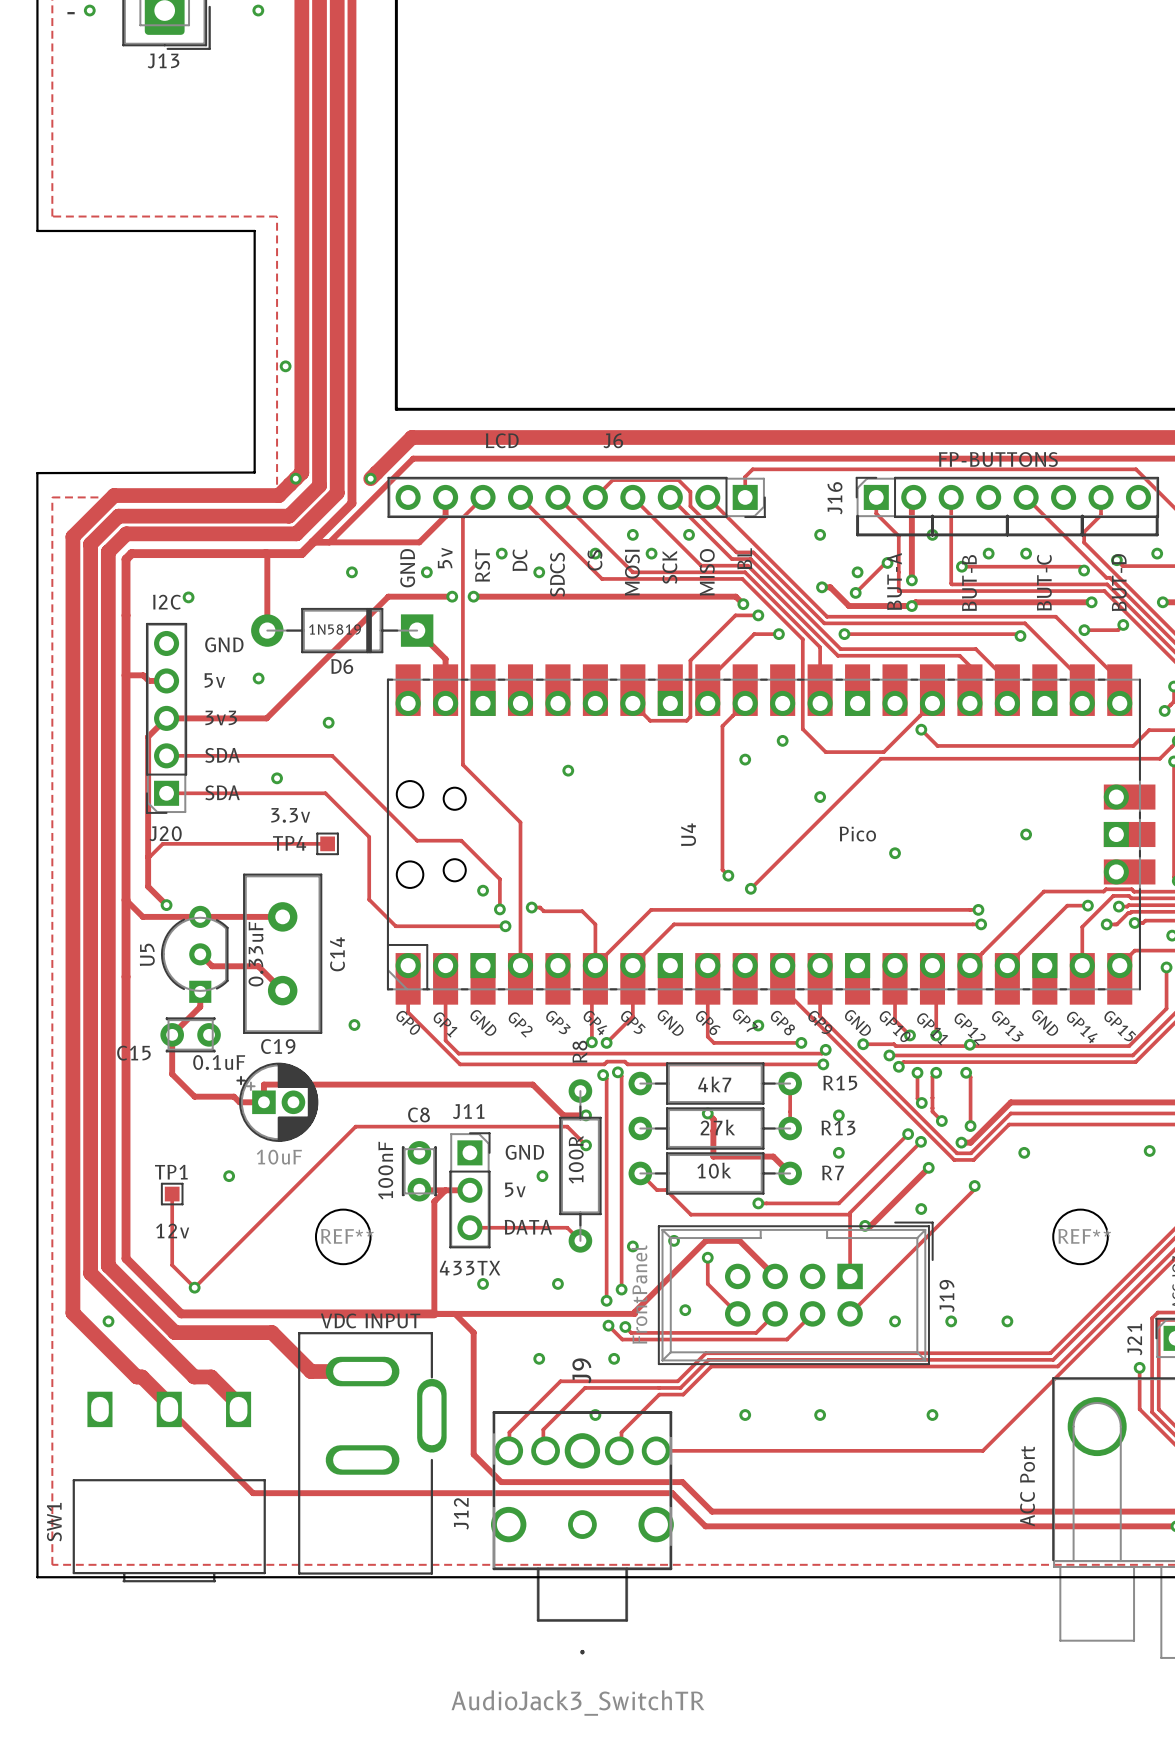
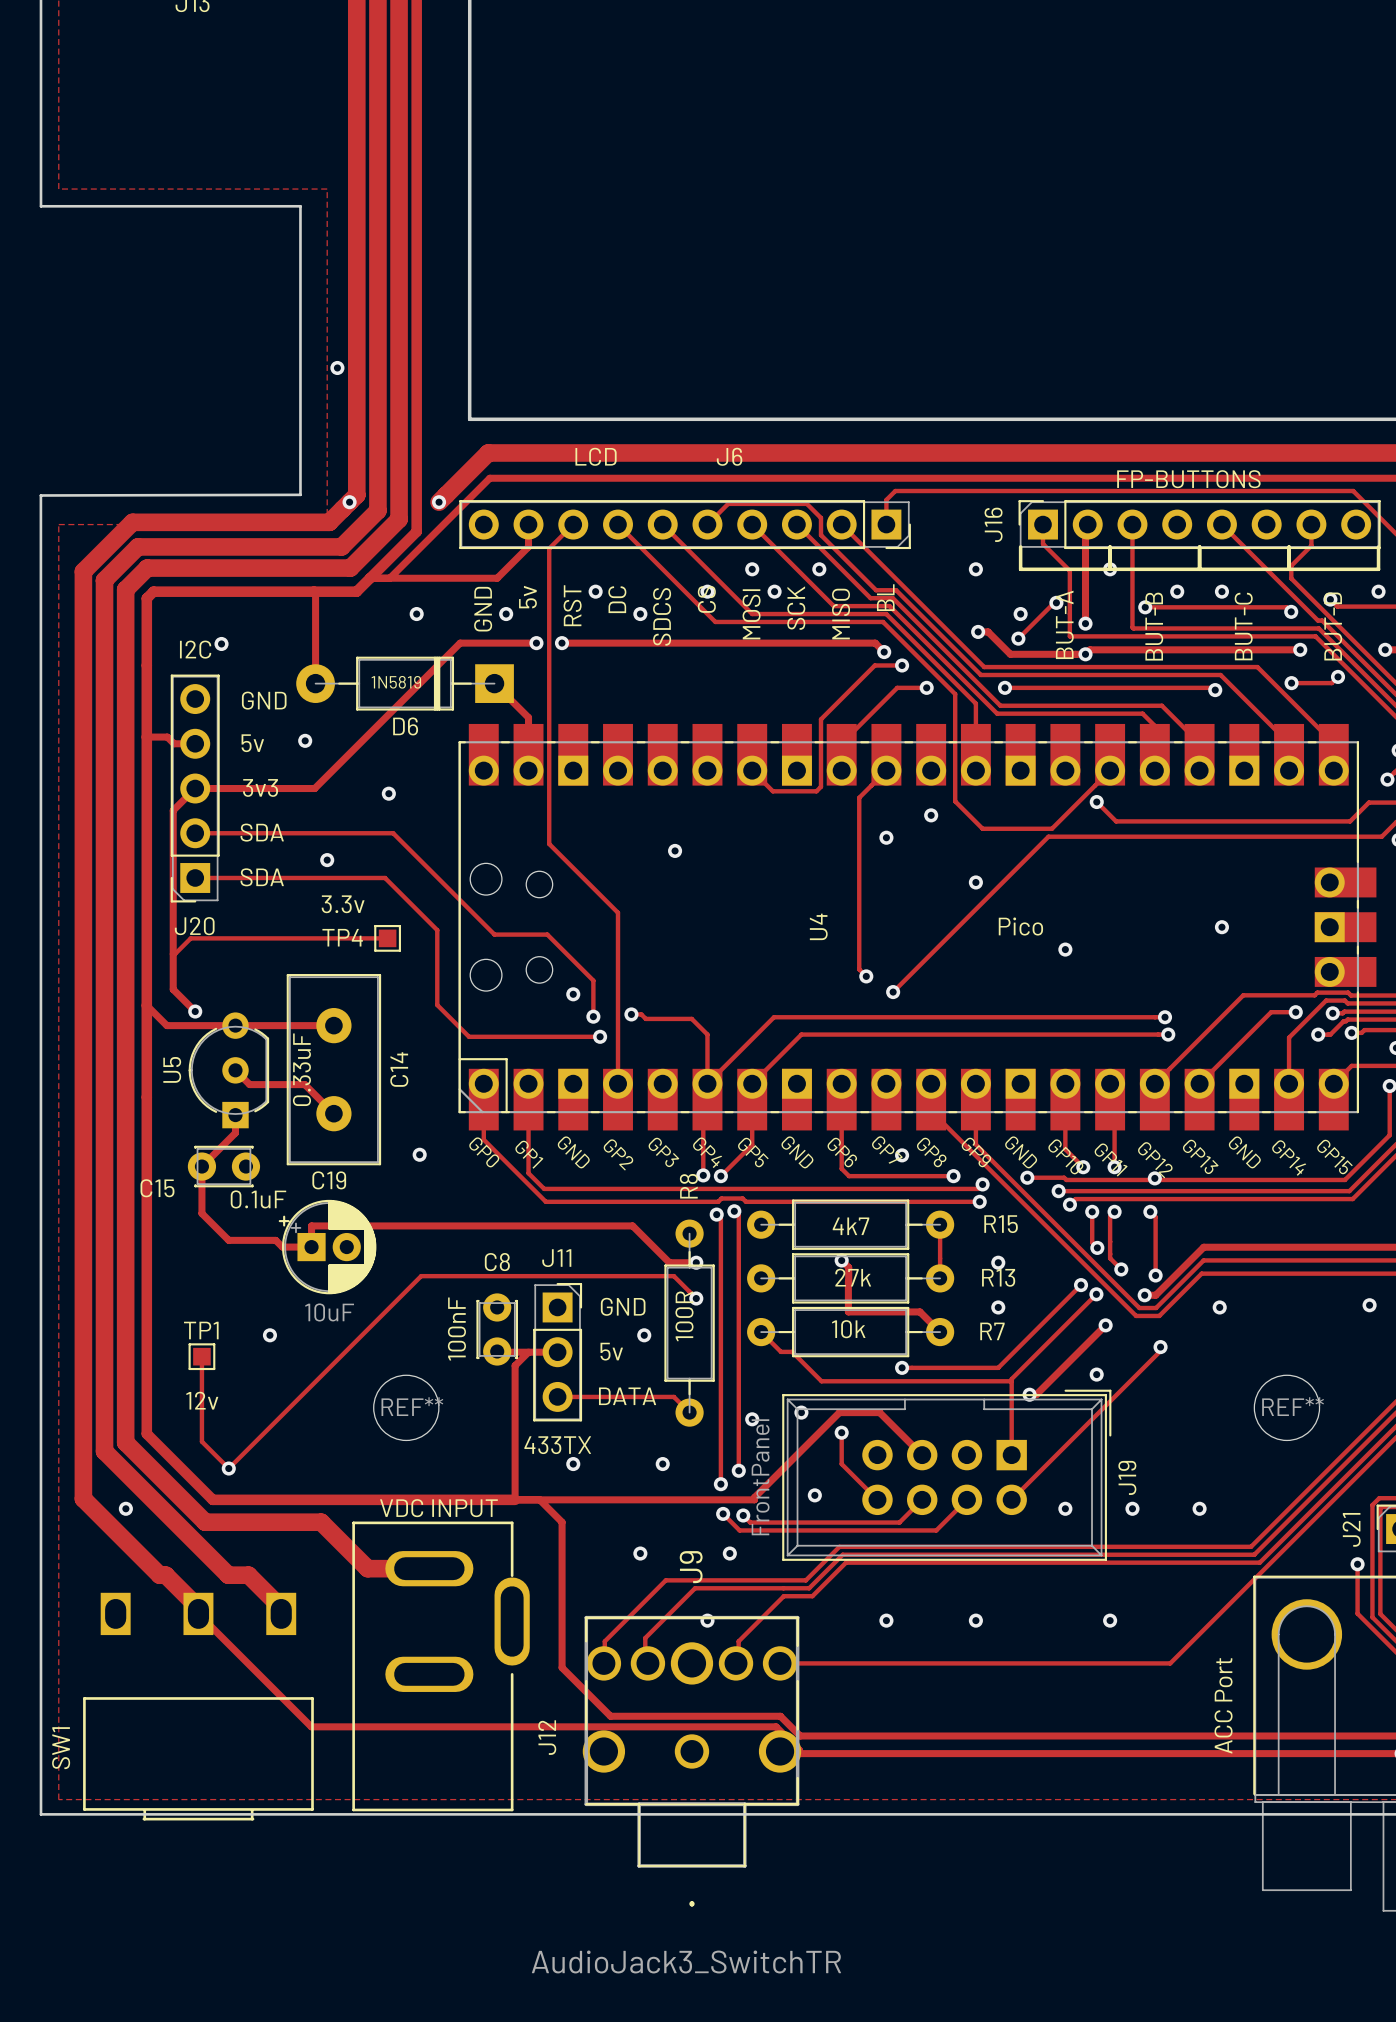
track: (501, 1482) (682, 1482) (712, 1511) -> (595, 1700) (610, 1716) (780, 1716) (800, 1735) (846, 1735)
track: (253, 1493) (672, 1493) (705, 1526) -> (298, 1713) (311, 1726) (776, 1726) (799, 1750) (799, 1753) (839, 1753)

